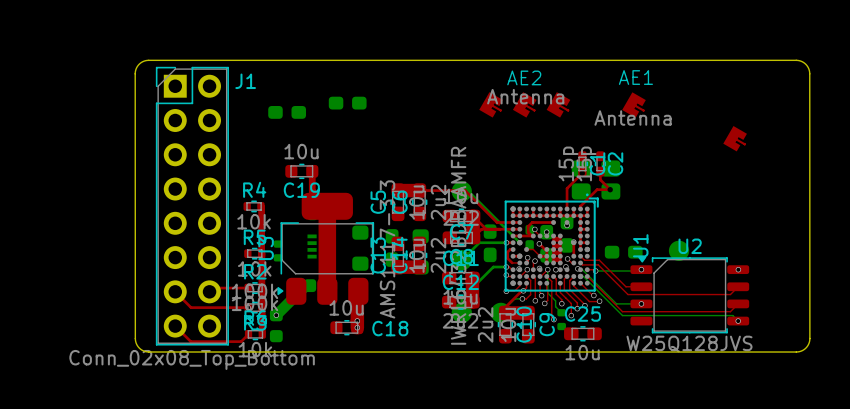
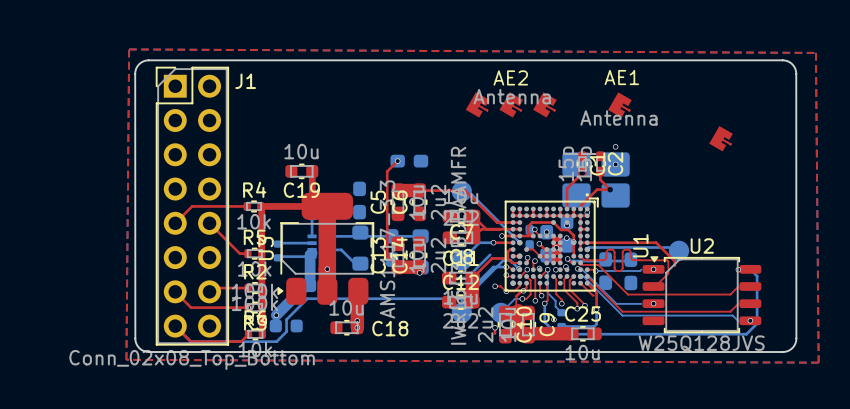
top zone outline: none -> (129, 49) (126, 359) (818, 362) (815, 52) (129, 49)
board edge: (782, 60) (802, 61) (806, 65) (809, 72) (809, 338) (807, 345) (802, 350) (782, 352) -> (782, 60) (792, 64) (796, 73) (796, 338) (792, 348) (782, 352)
part: (347, 103) -> none
AE2 position: (524, 104) -> (511, 104)
part: (287, 112) -> none
AE1 position: (684, 121) -> (670, 121)
via: none -> (615, 146)
part footprint: [571, 160, 621, 200] -> [562, 152, 630, 208]
top track: none -> (397, 161) (387, 171) (387, 256) (398, 267)
via: none -> (397, 161)
part: none -> (409, 161)
via: none -> (615, 164)
part: none -> (359, 200)
top track: none -> (247, 206) (192, 206) (175, 223)
top track: none -> (260, 206) (327, 206)
via: none -> (587, 212)
bottom track: none -> (312, 216) (312, 236)
top track: none -> (553, 222) (560, 229) (568, 229) (573, 235) (573, 242)
top track: none -> (209, 223) (239, 253) (247, 253)
top track: none -> (502, 235) (513, 235)
via: none -> (502, 235)
bottom track: none -> (329, 236) (420, 236)
via: none -> (566, 238)
top track: none -> (493, 242) (506, 242)
bottom track: (493, 242) (506, 242) -> none
via: none -> (493, 242)
via: (506, 242) -> none
top track: none -> (587, 242) (656, 242) (674, 261) (674, 265)
bottom track: none -> (312, 243) (278, 244)
part: (490, 243) -> none
via: none -> (556, 247)
bottom track: none -> (329, 249) (341, 249) (359, 268)
bottom track: none -> (587, 249) (589, 247) (675, 247) (679, 250)
part: (623, 252) -> none
bottom track: none -> (312, 253) (310, 255) (310, 285)
bottom track: none -> (490, 254) (466, 278) (449, 278)
bottom track: none -> (312, 256) (278, 257)
top track: none -> (507, 258) (492, 258) (472, 278)
bottom track: none -> (567, 258) (569, 261) (626, 261)
top track: (599, 260) (625, 286) (641, 286) -> (599, 260) (605, 259) (607, 250) (612, 249) (614, 252) (614, 268) (620, 270) (622, 268) (622, 251) (625, 249) (630, 250) (630, 258) (633, 260) (667, 260) (668, 273) (653, 286)
via: none -> (327, 269)
bottom track: none -> (519, 269) (510, 260) (503, 260) (465, 298) (307, 298) (286, 319) (286, 331) (276, 341) (190, 341) (175, 326)
via position: (641, 269) -> (653, 269)
bottom track: none -> (750, 269) (757, 276) (757, 323) (746, 334) (556, 334) (544, 322) (544, 303)
part: none -> (605, 271)
part: none -> (630, 271)
via: none -> (419, 272)
top track: (546, 276) (551, 281) (551, 317) (553, 319) -> none
top track: (560, 283) (560, 292) (571, 303) (571, 315) -> none
top track: (573, 283) (573, 285) (589, 301) (599, 301) -> none
top track: none -> (587, 283) (596, 292) (596, 309)
top track: none -> (495, 286) (500, 286) (506, 291)
via: none -> (495, 286)
U2 position: (689, 294) -> (701, 294)
via: (593, 295) -> none
top track: (516, 296) (505, 307) -> (516, 296) (518, 333) (571, 333)
via: (599, 301) -> none
via position: (641, 303) -> (653, 303)
bottom track: none -> (596, 309) (596, 324) (594, 326) (561, 326)
via: none -> (596, 309)
via: (571, 315) -> none
via position: (738, 321) -> (750, 320)
part rotation: 0° (276, 325) -> 90° clockwise (286, 325)
top track: none -> (494, 327) (494, 333)
via: none -> (495, 327)

